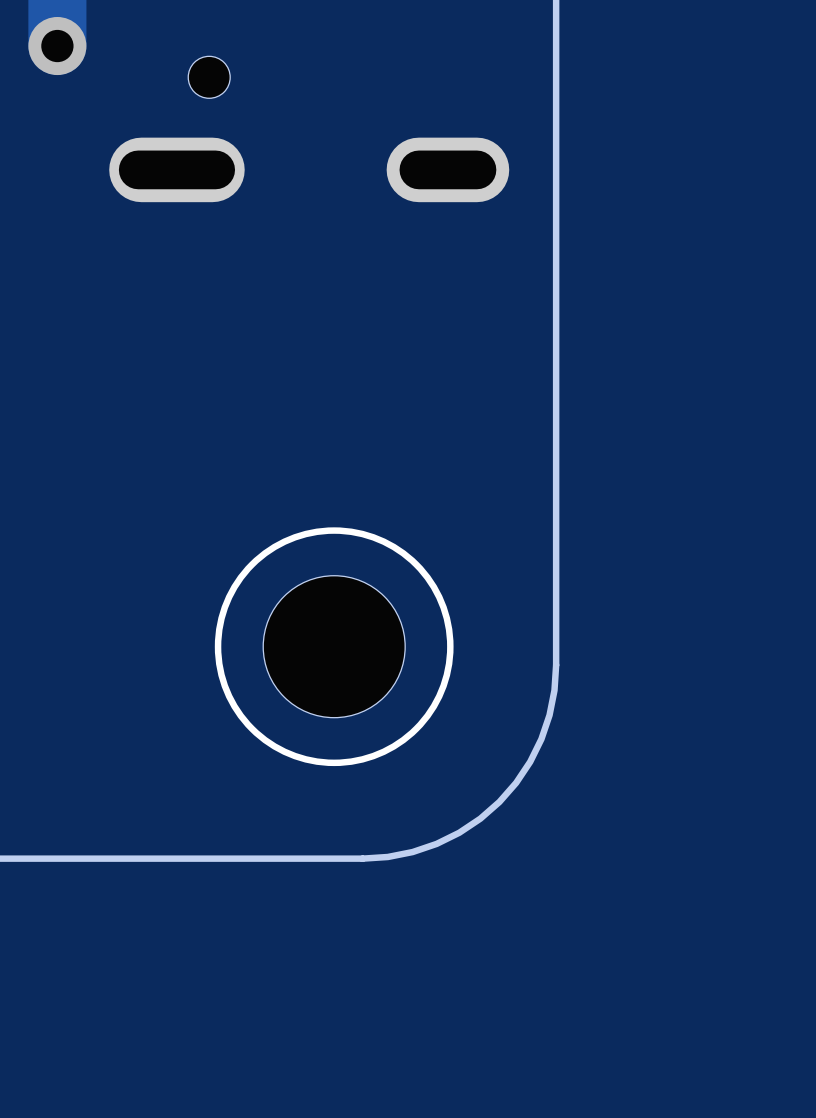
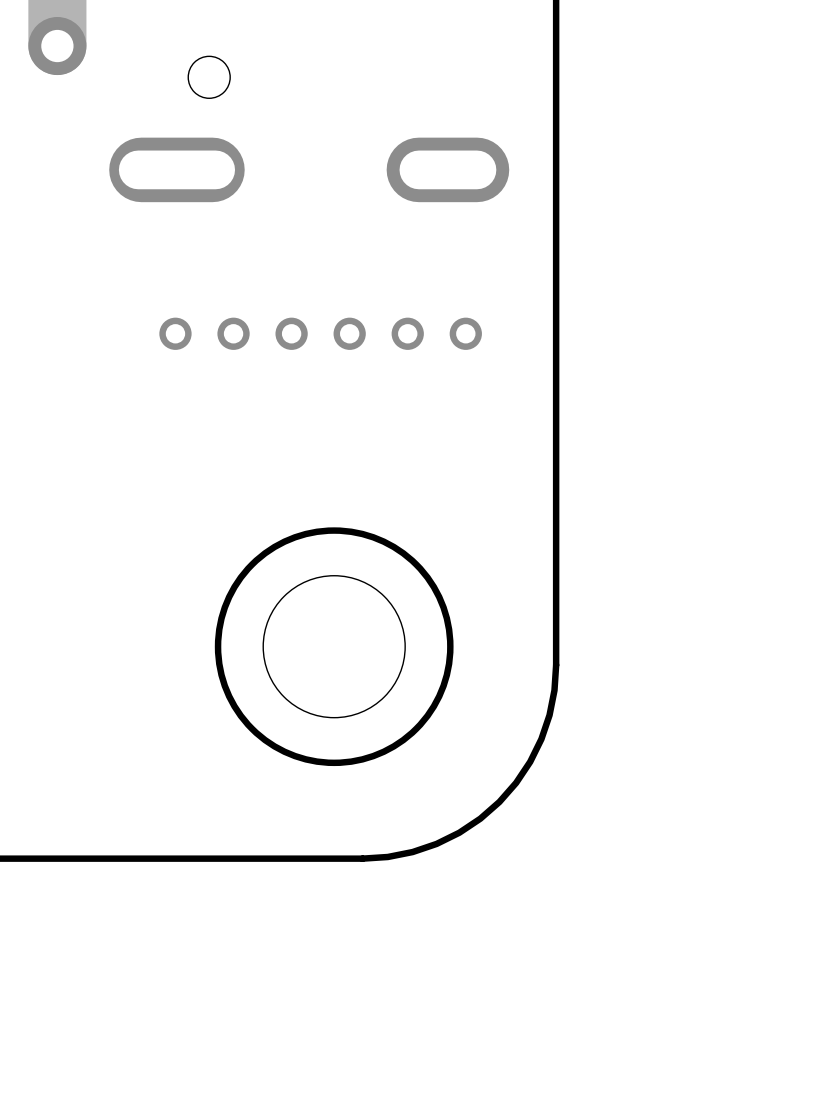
via: none -> (175, 333)
via: none -> (233, 333)
via: none -> (291, 333)
via: none -> (349, 333)
via: none -> (407, 333)
via: none -> (465, 333)

